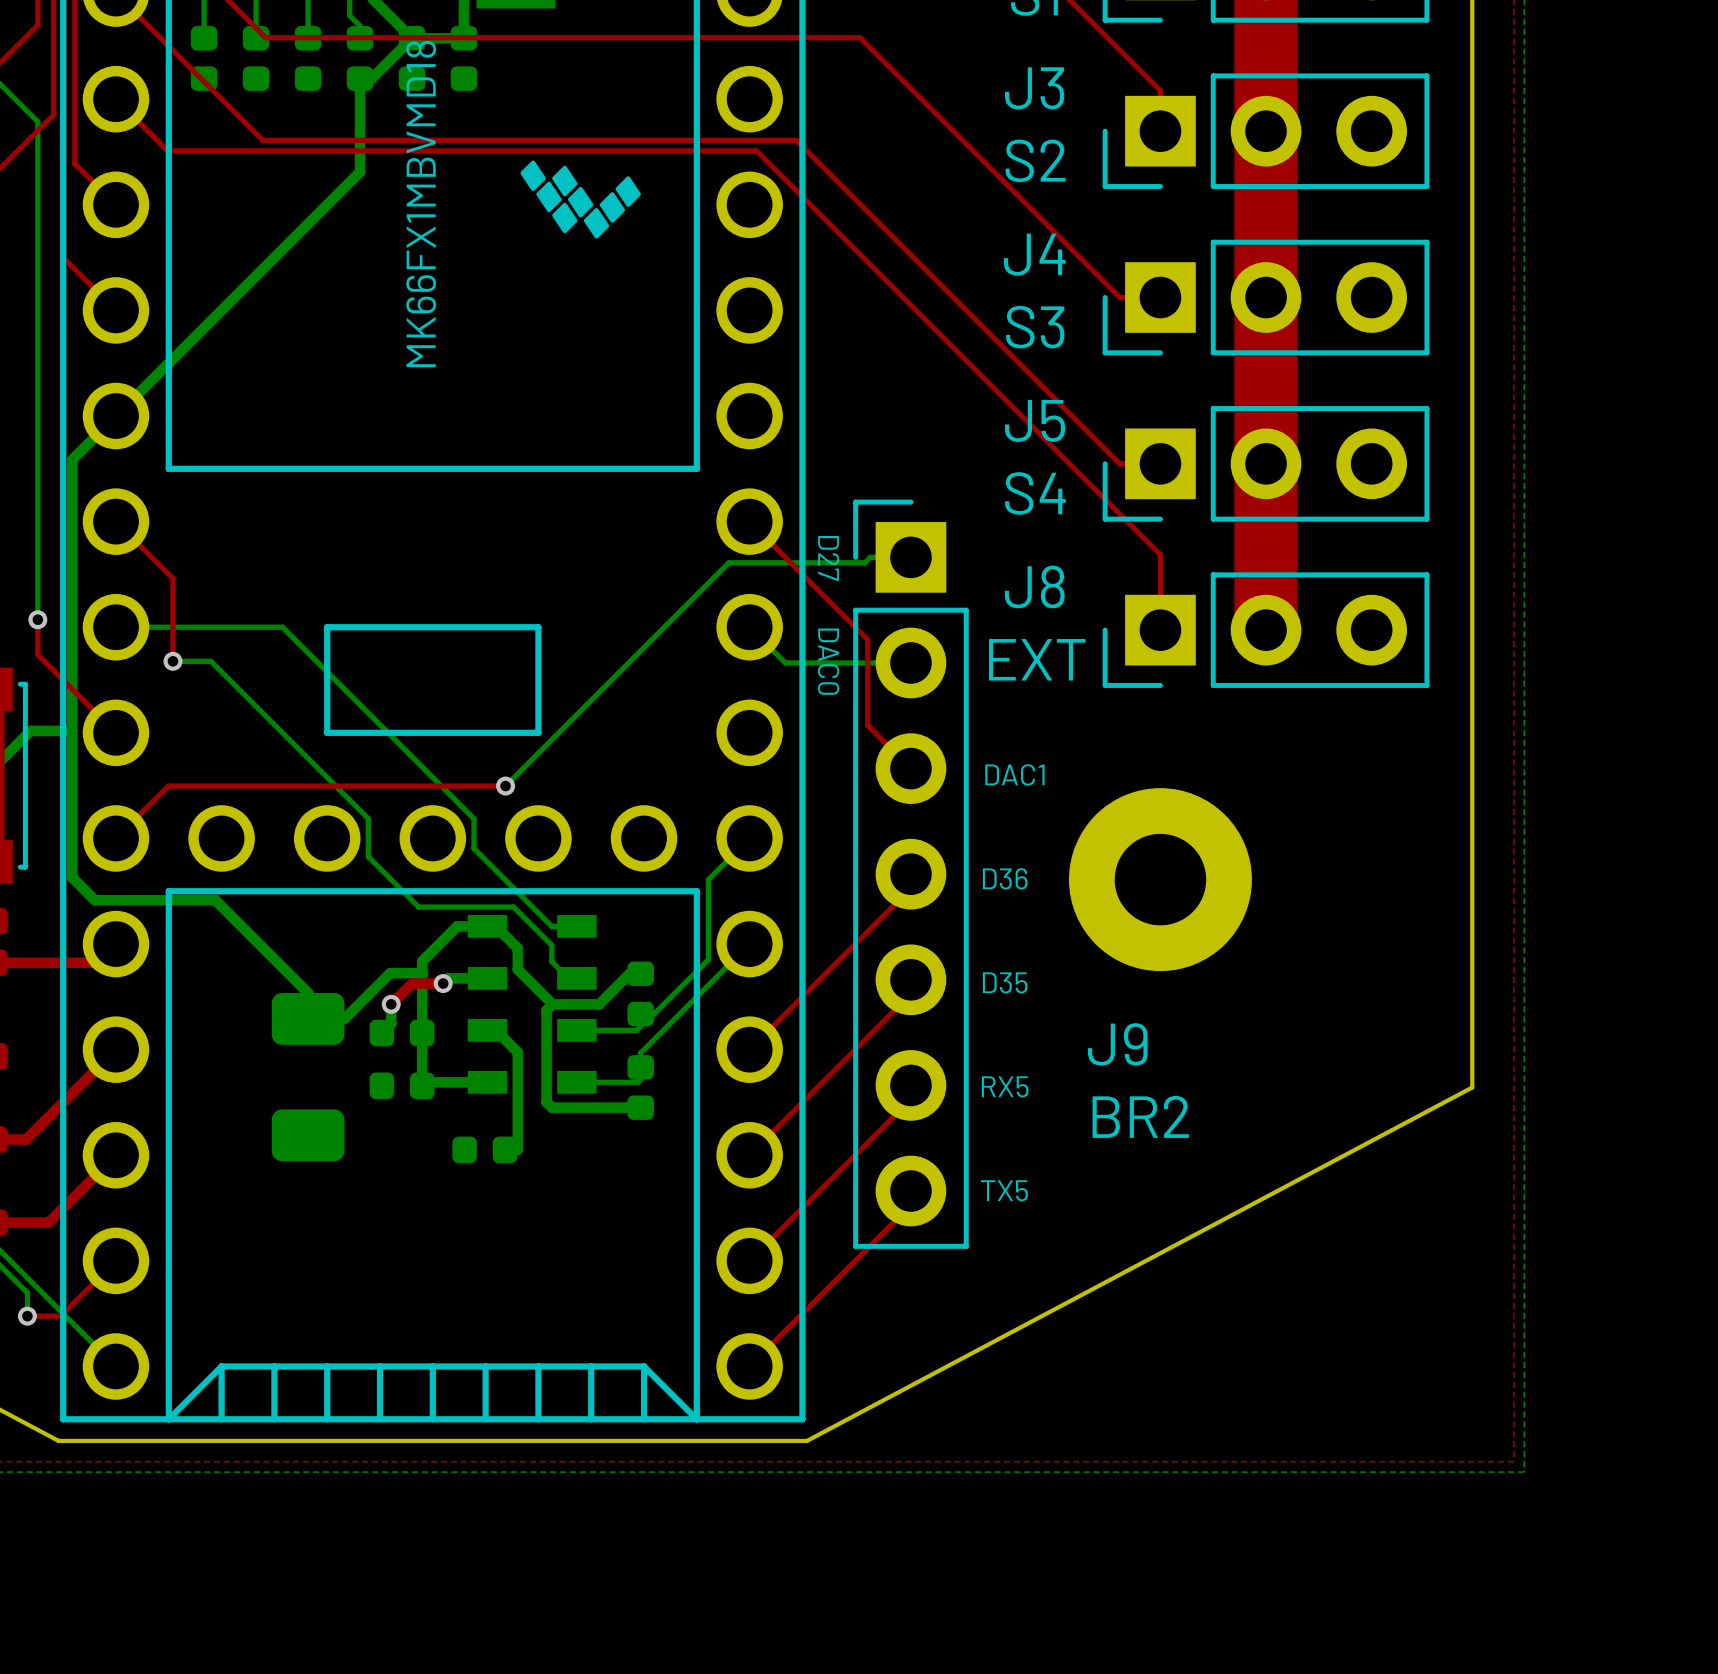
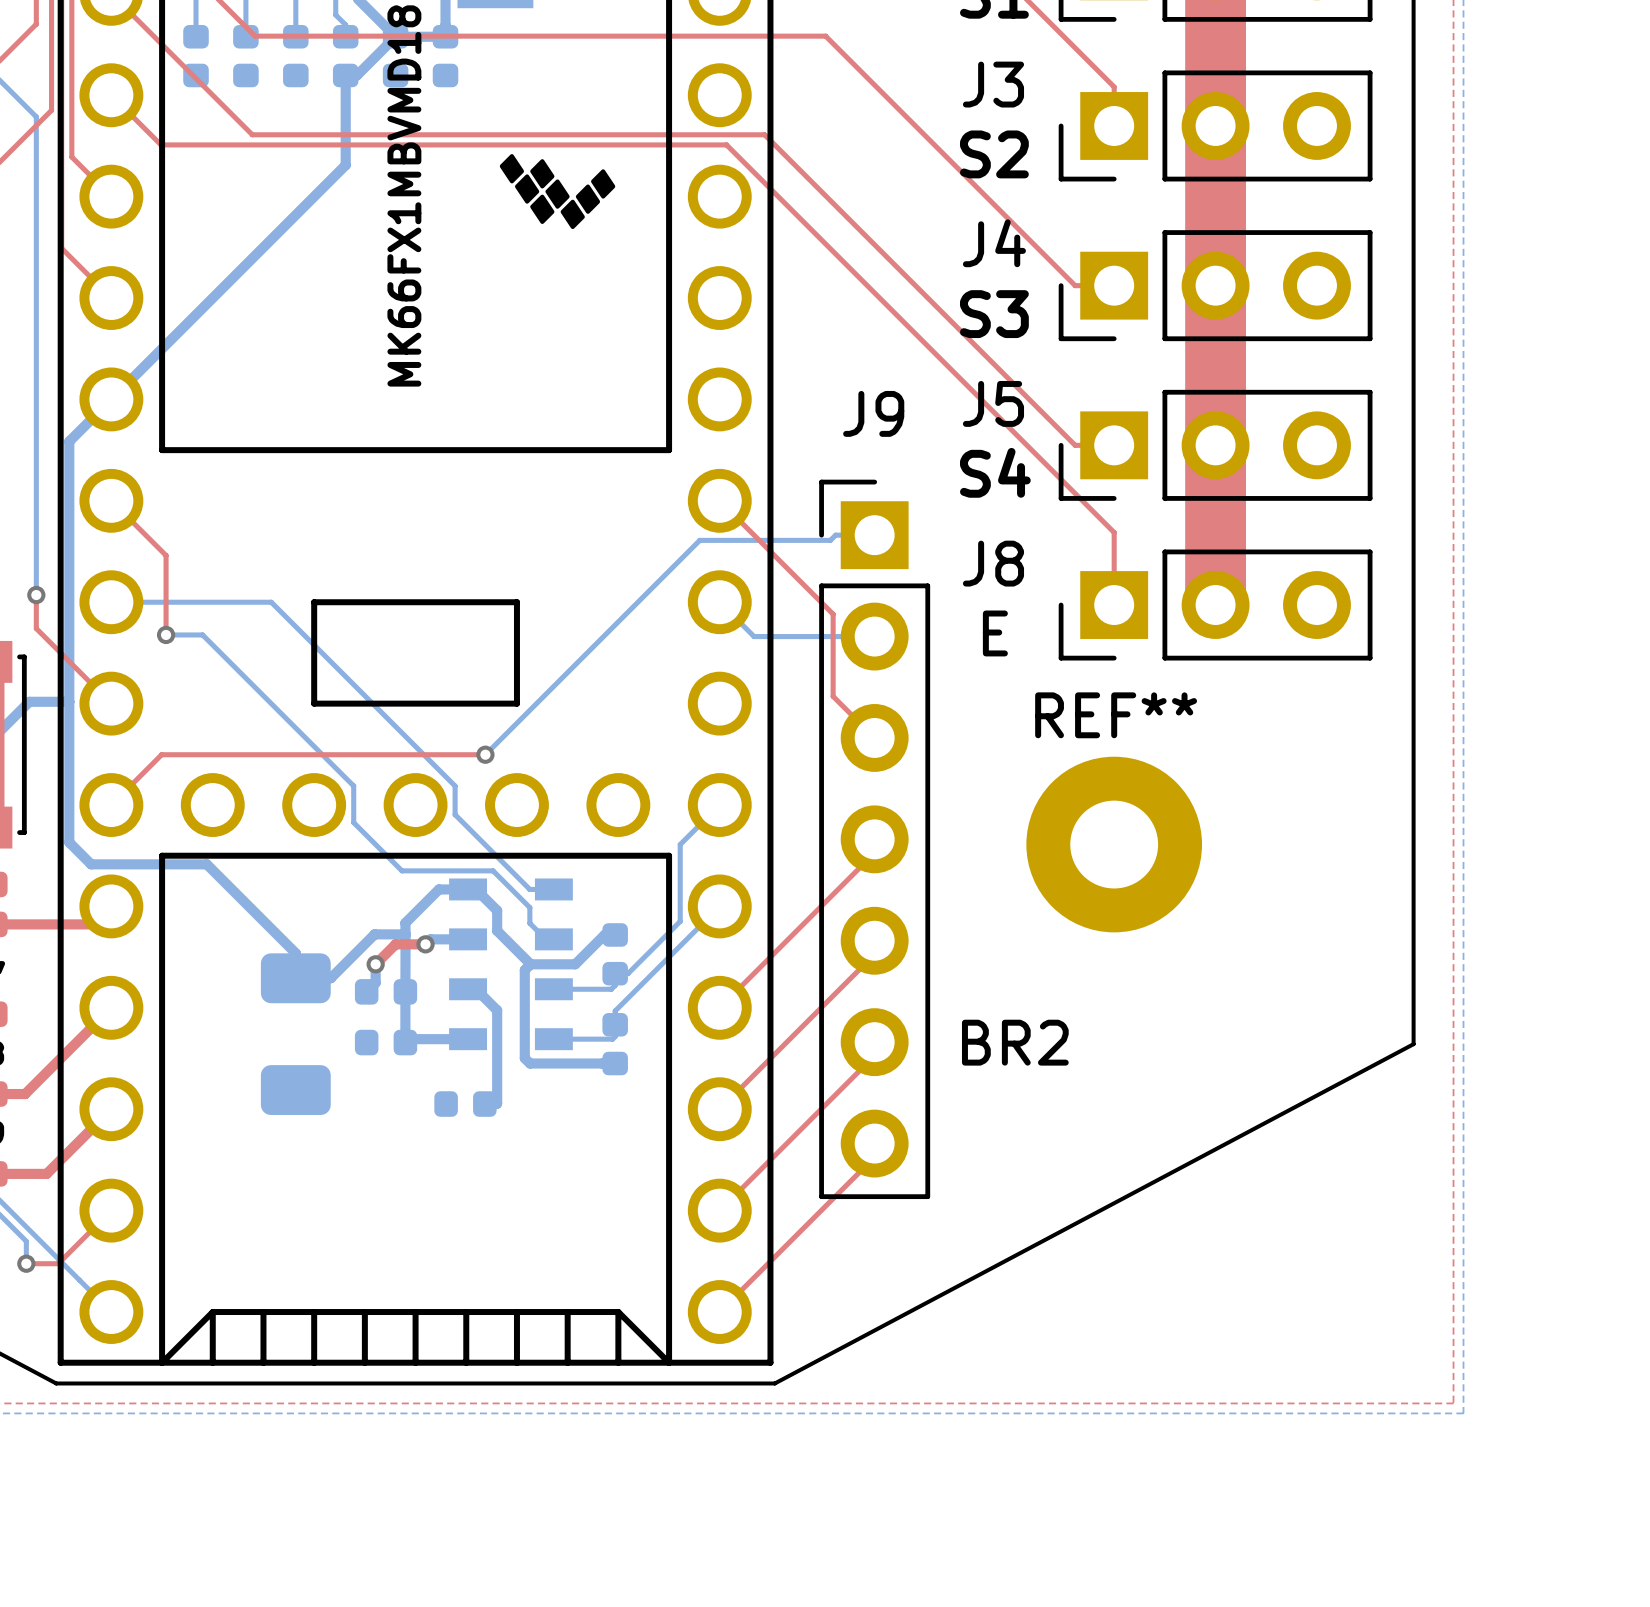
text: D27 (828, 558) -> none
text: EXT (1037, 659) -> E (995, 633)
text: DAC0 (828, 661) -> none
REF** name: none -> REF** (1116, 715)
text: DAC1 (1014, 774) -> none
text: D36 (1005, 878) -> none
text: D35 (1005, 982) -> none
J9 name position: J9 (1117, 1044) -> J9 (873, 413)
text: RX5 (1005, 1086) -> none
text position: BR2 (1140, 1116) -> BR2 (1015, 1042)
text: TX5 (1004, 1190) -> none

